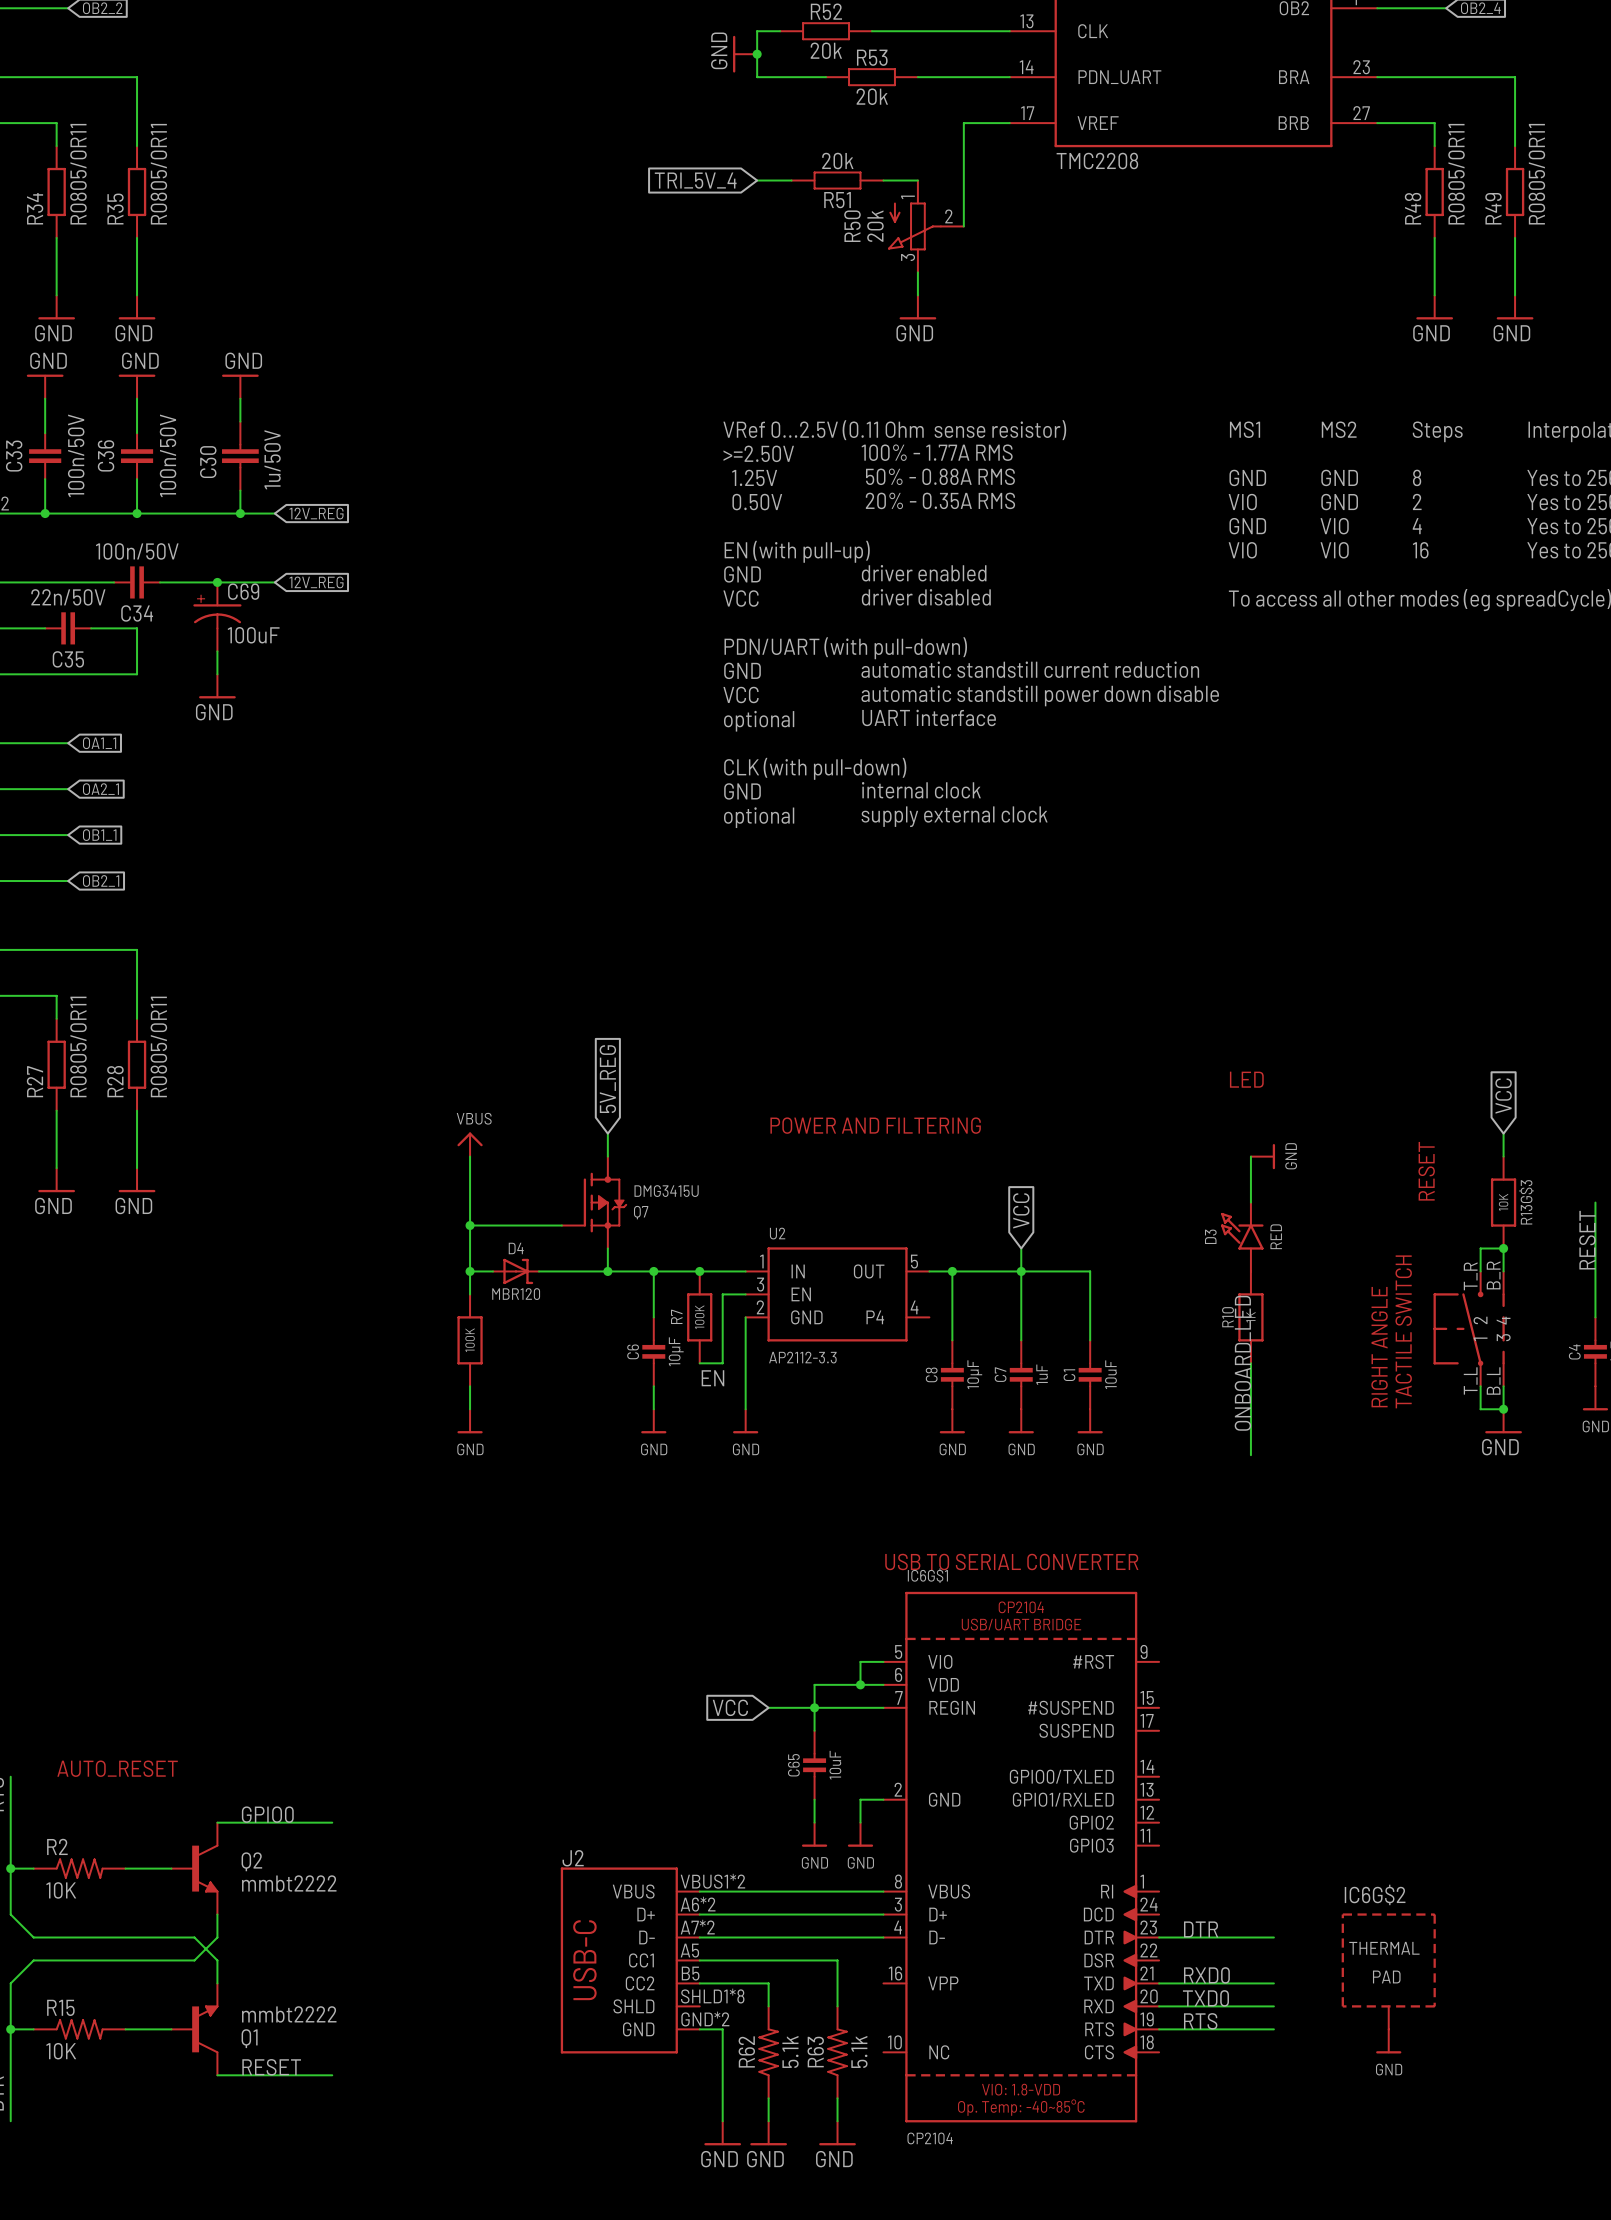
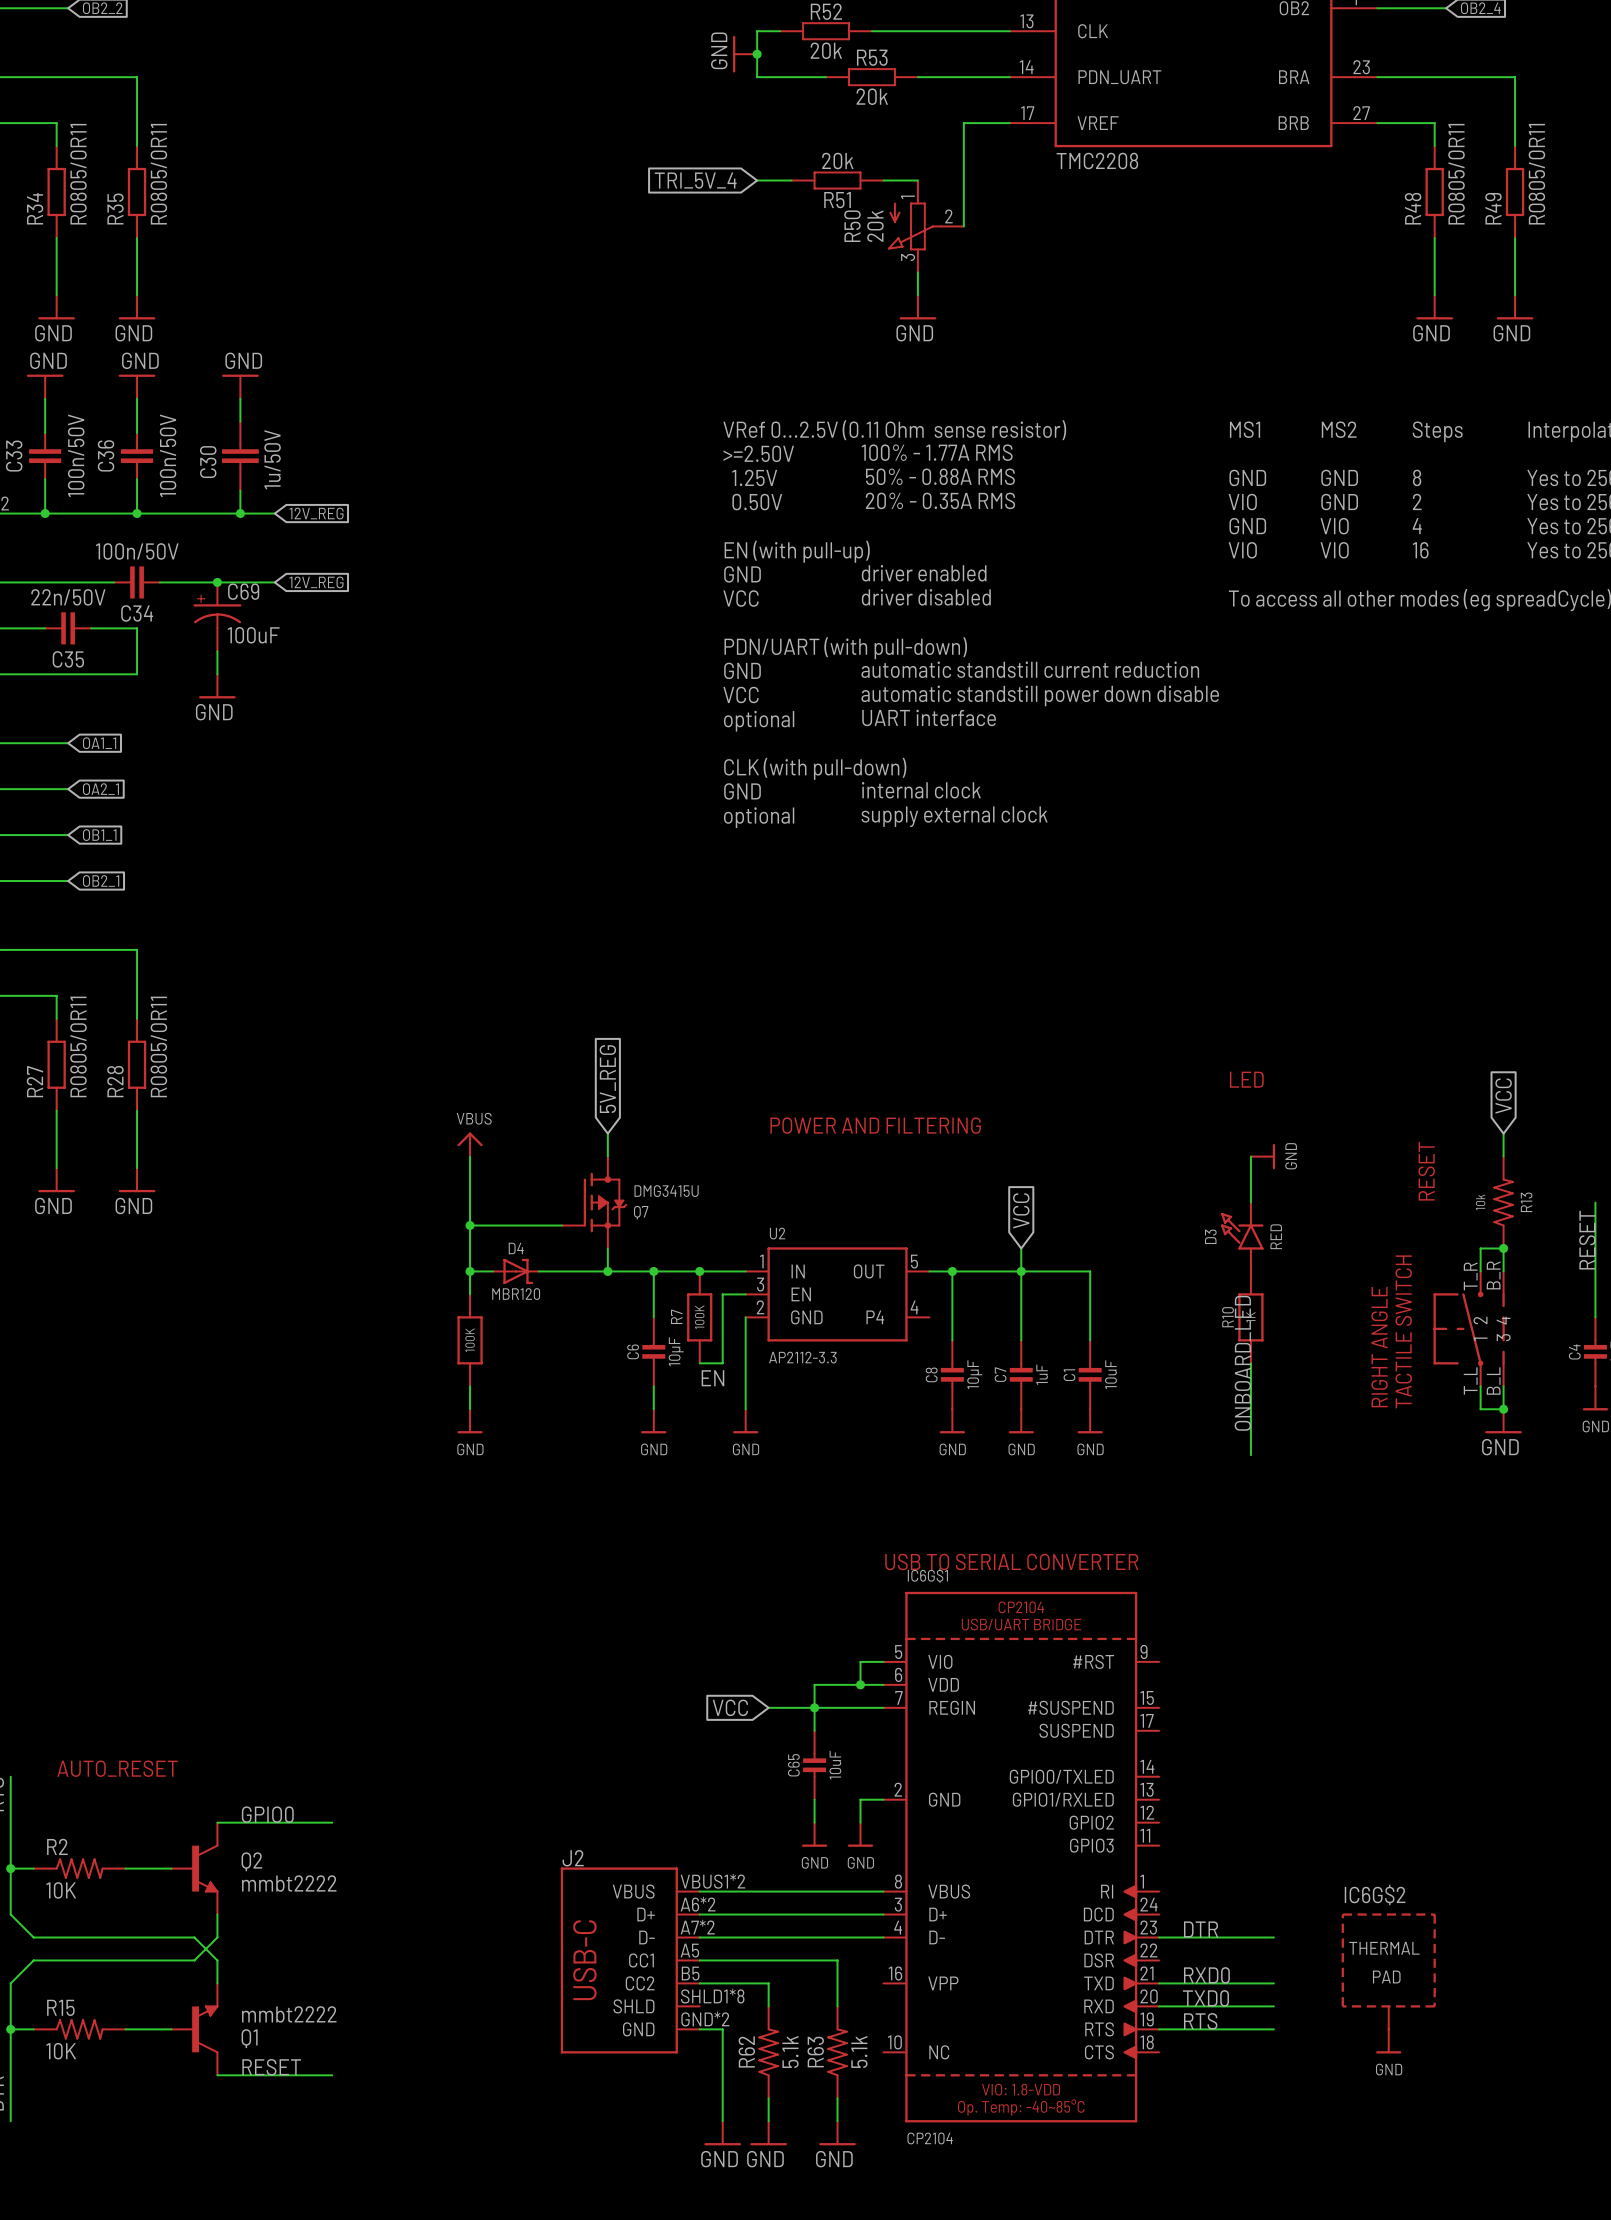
R13G$3: 10K (1503, 1202) -> none
R13: none -> 10k (1503, 1202)

